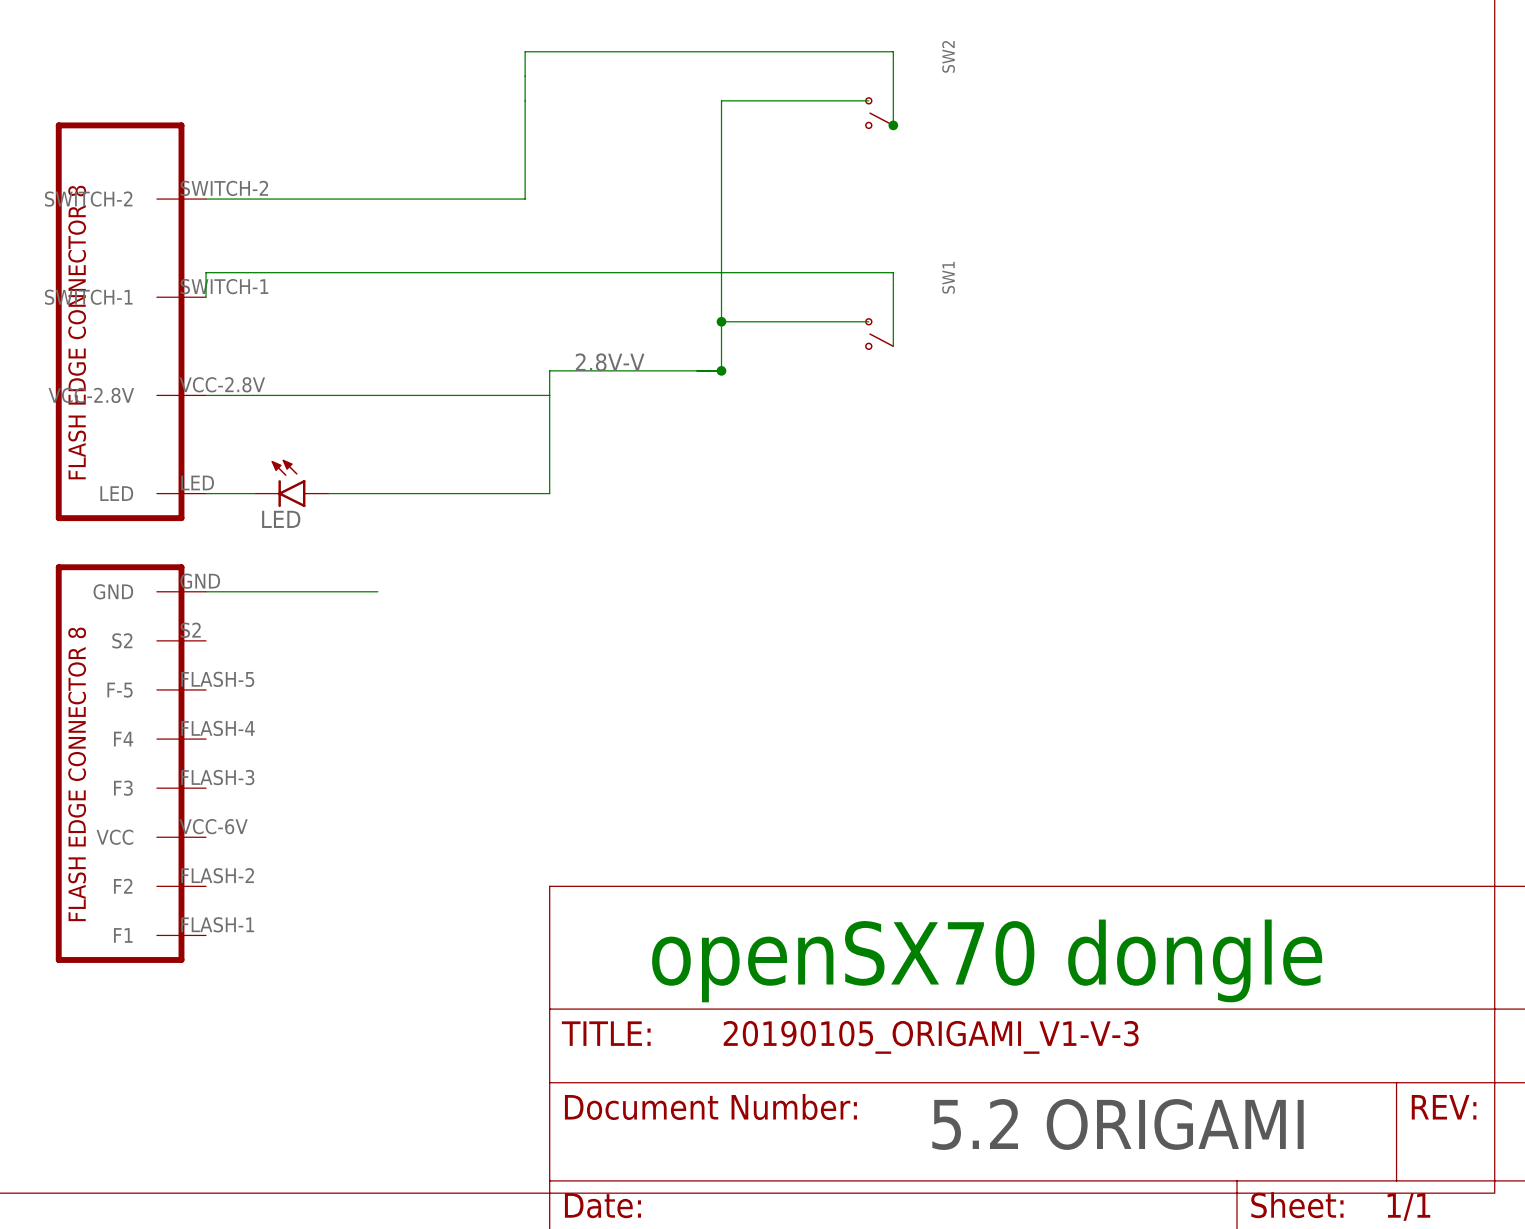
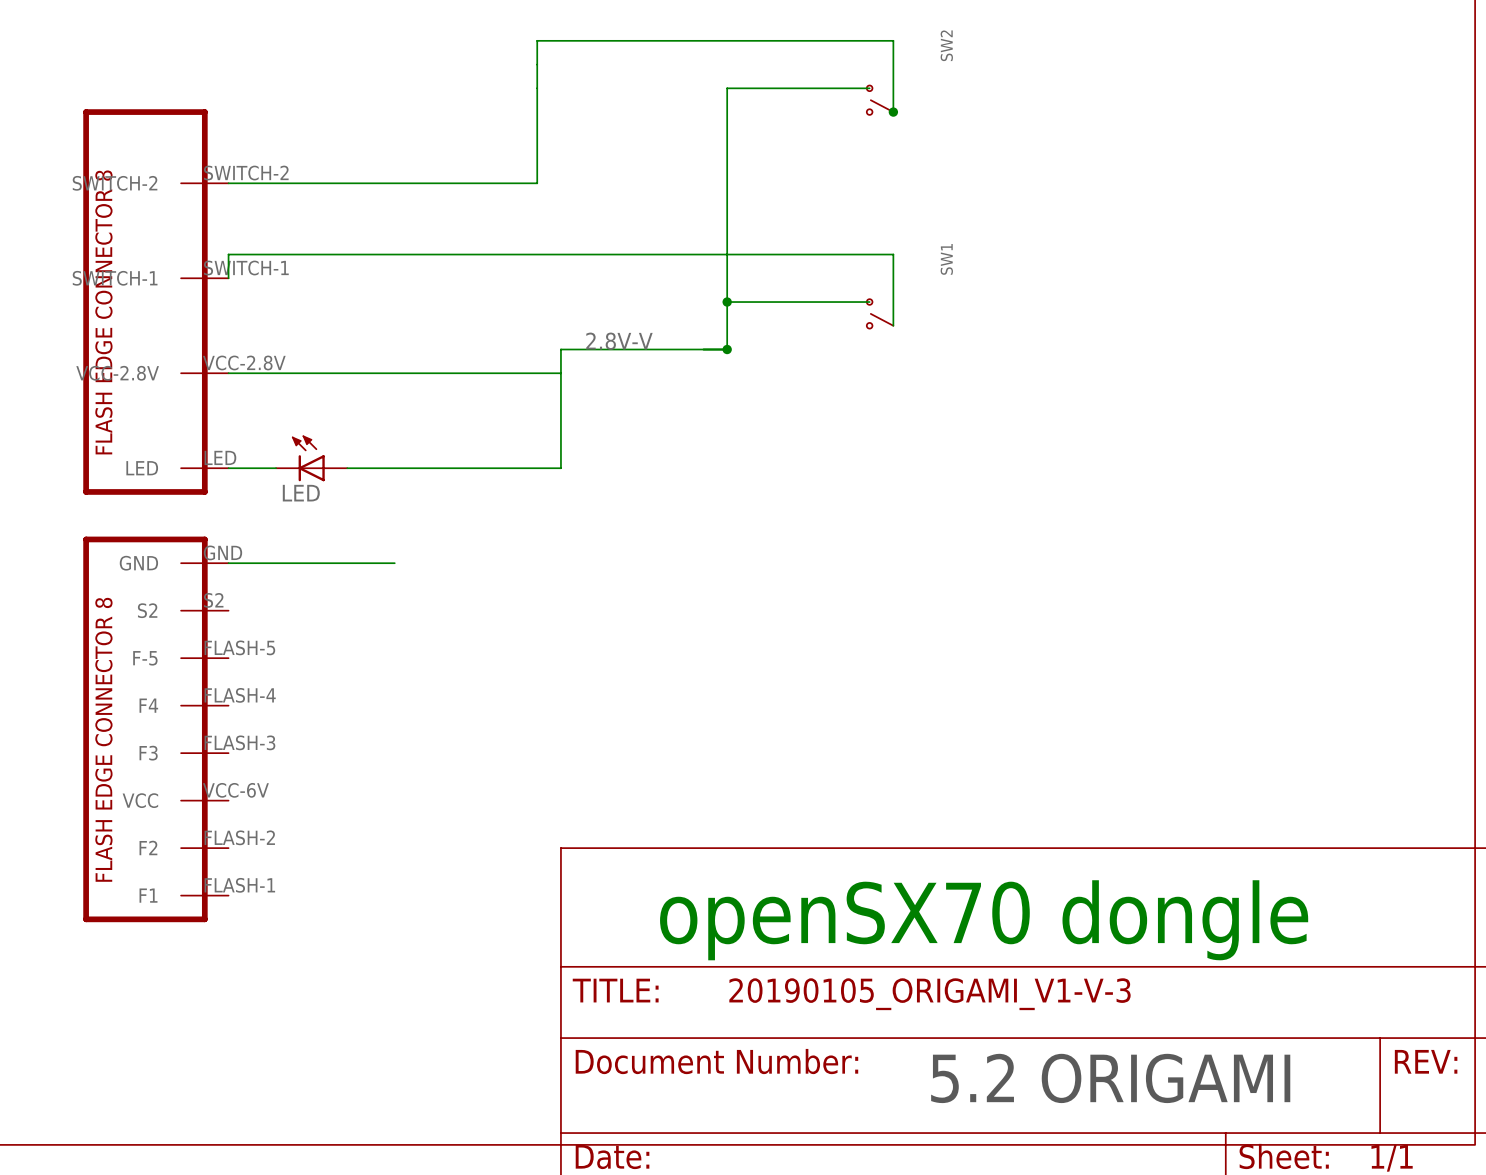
LED symbol: [255, 459, 329, 508] -> [276, 435, 348, 482]

